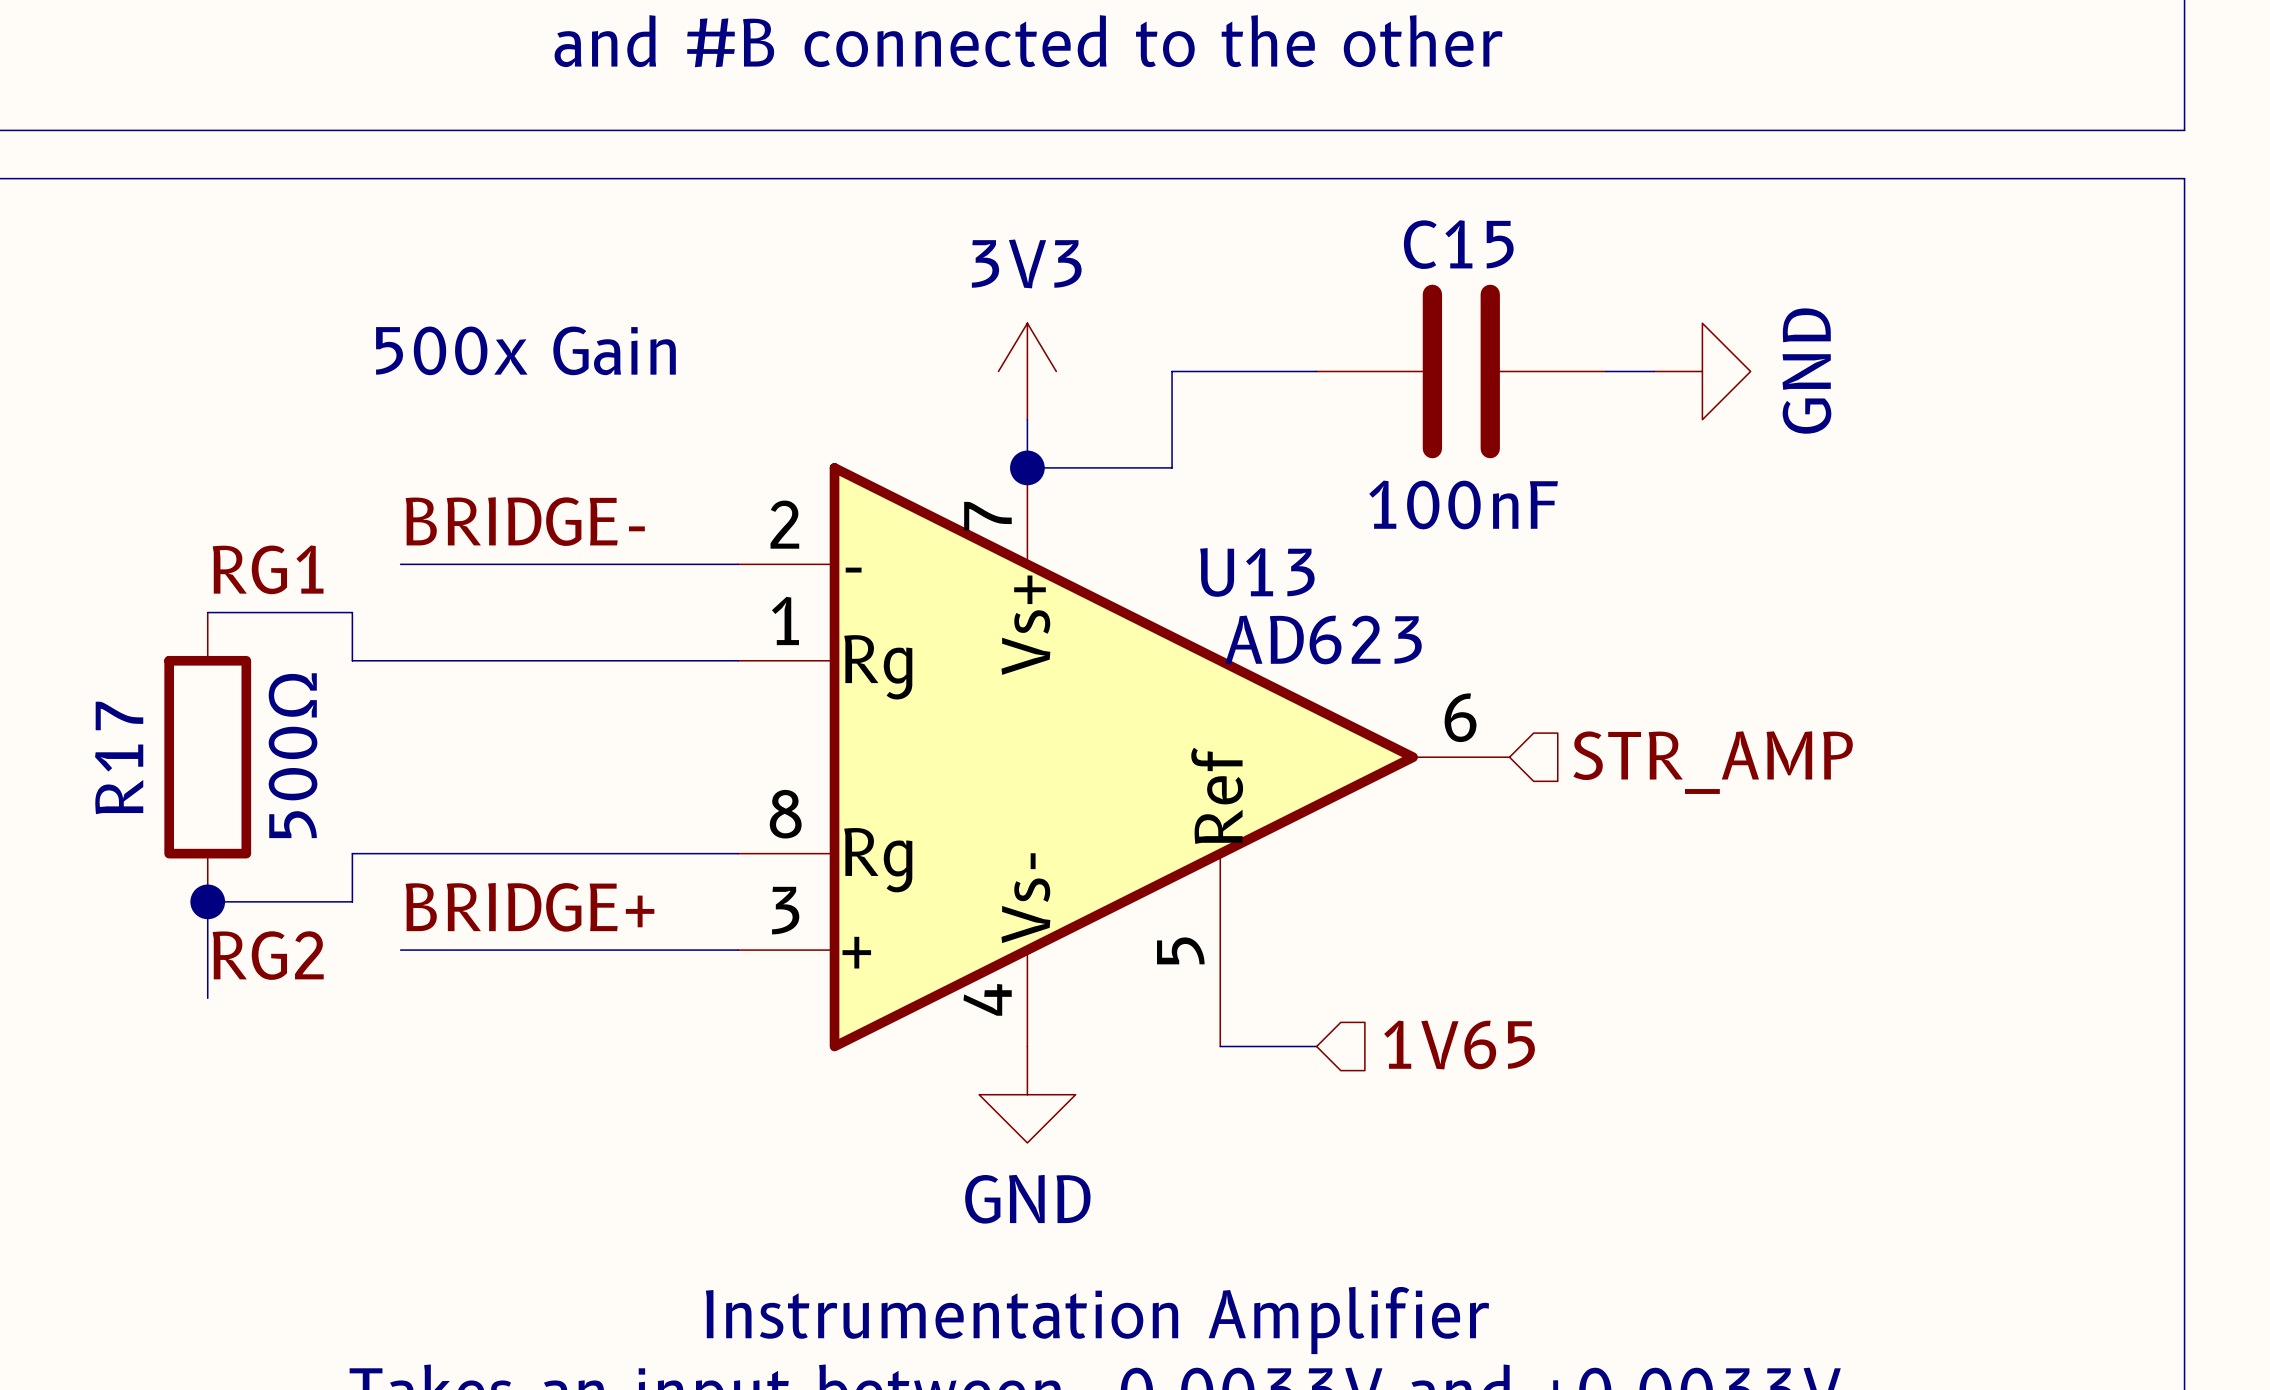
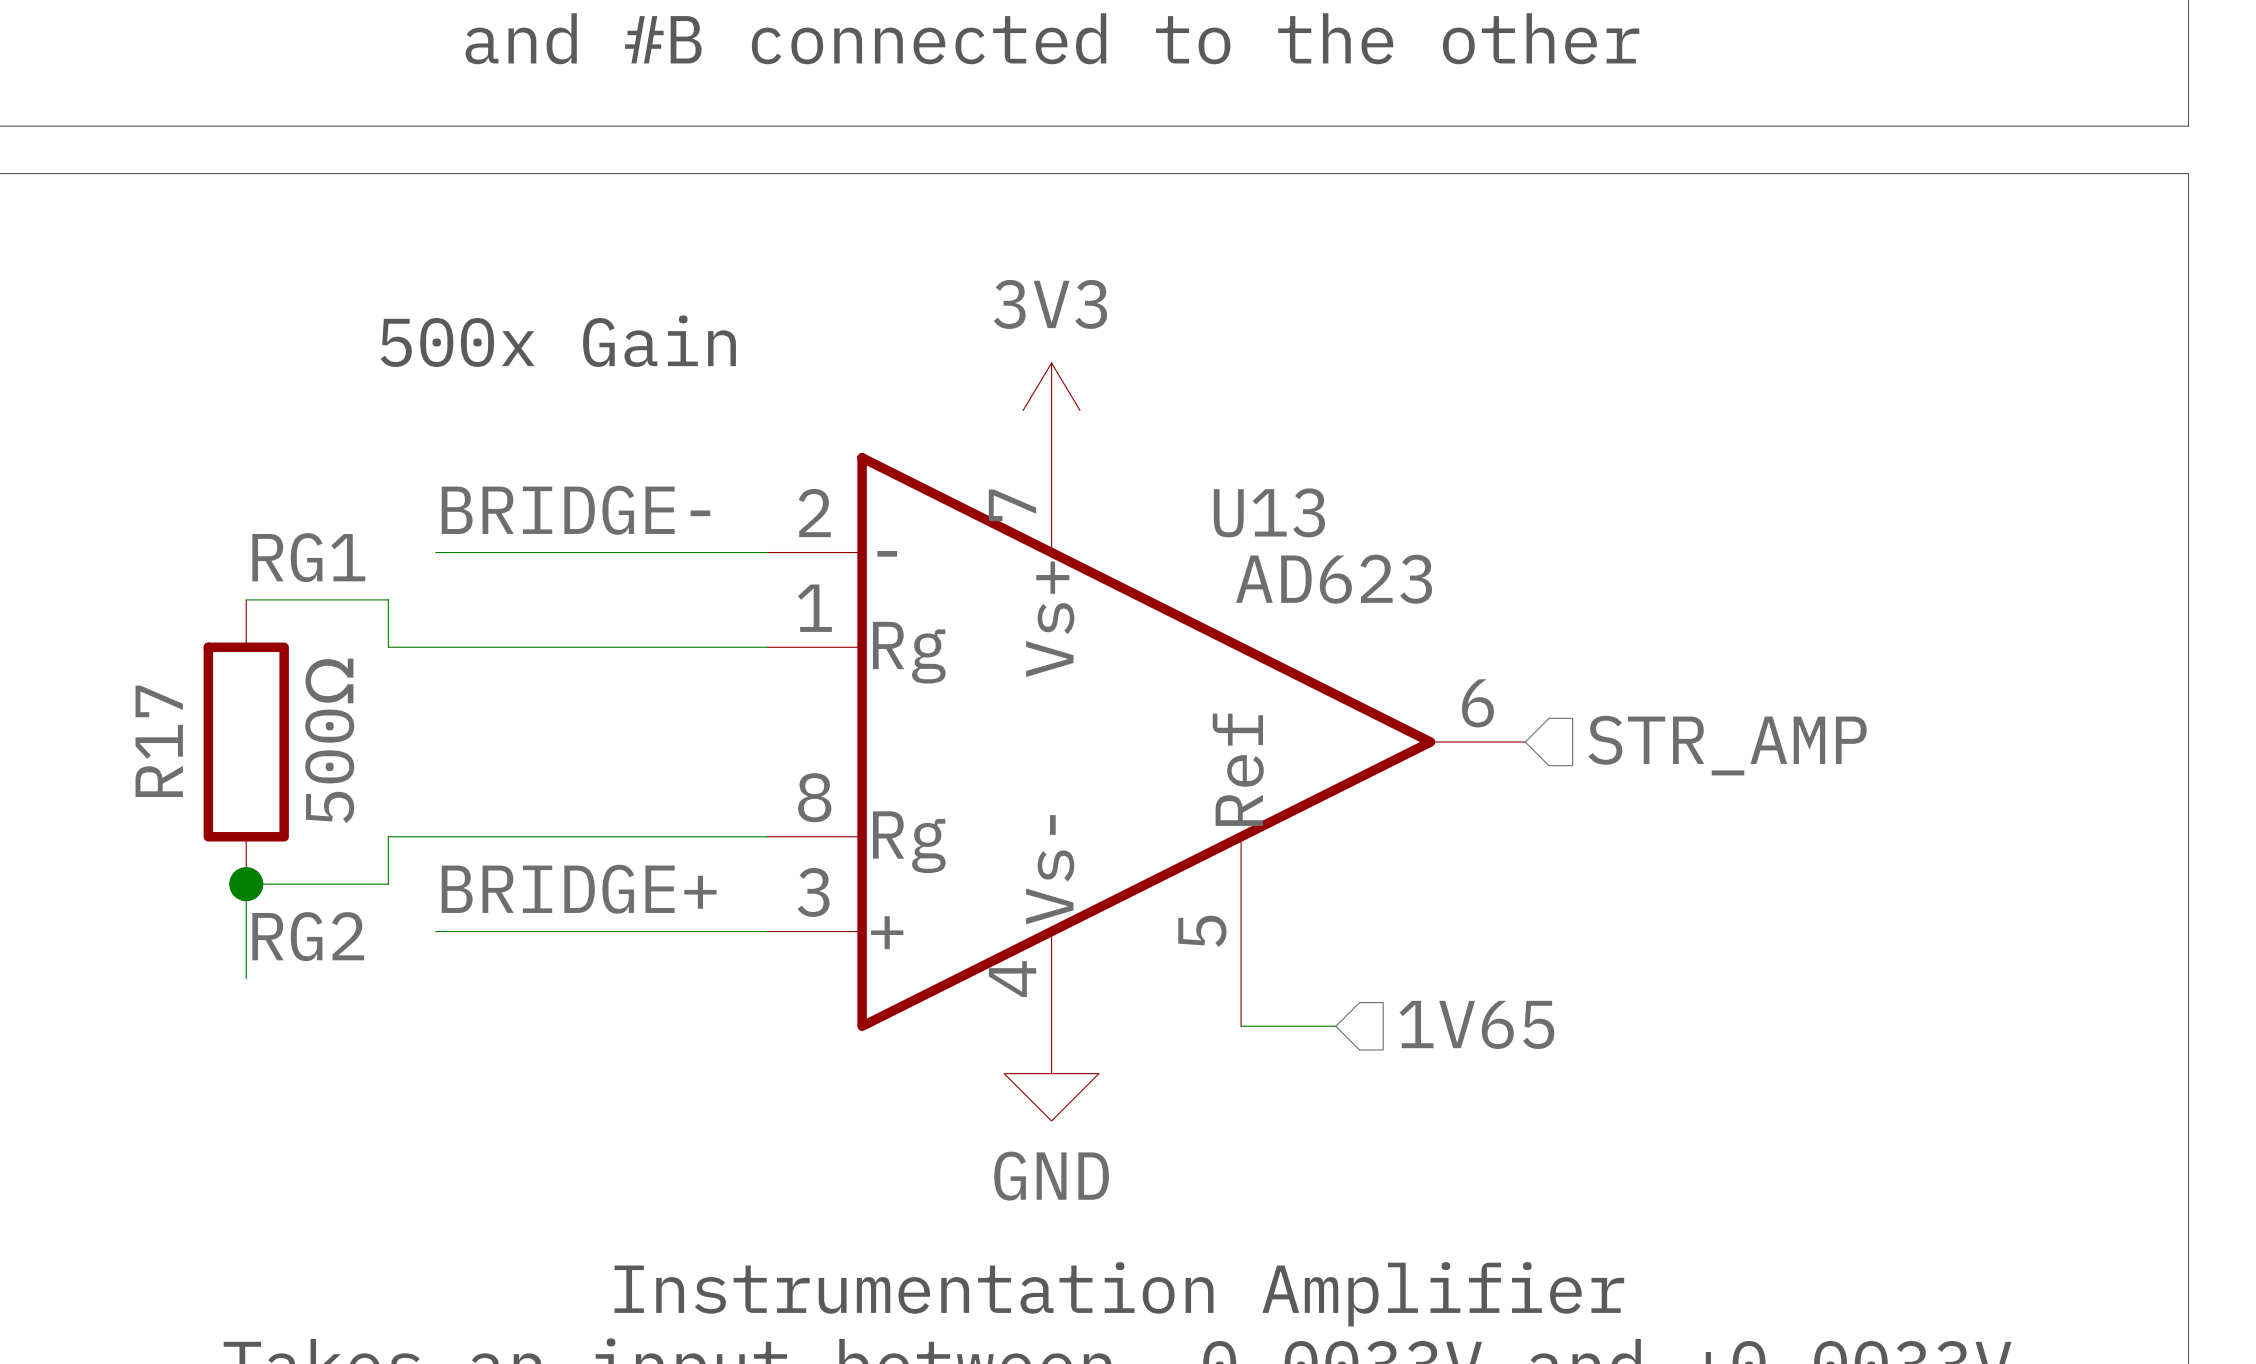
power symbol position: 3V3 (1027, 371) -> 3V3 (1051, 410)
wire: (1316, 371) (1172, 371) (1172, 467) (1027, 467) (1027, 419) -> none
C15: 100nF (1461, 371) -> none
wire: (1605, 371) (1654, 371) -> none
power symbol: GND (1702, 371) -> none
junction: (1027, 467) -> none
U13 name position: U13 (1257, 572) -> U13 (1269, 512)
U13 value position: AD623 (1323, 639) -> AD623 (1334, 579)

